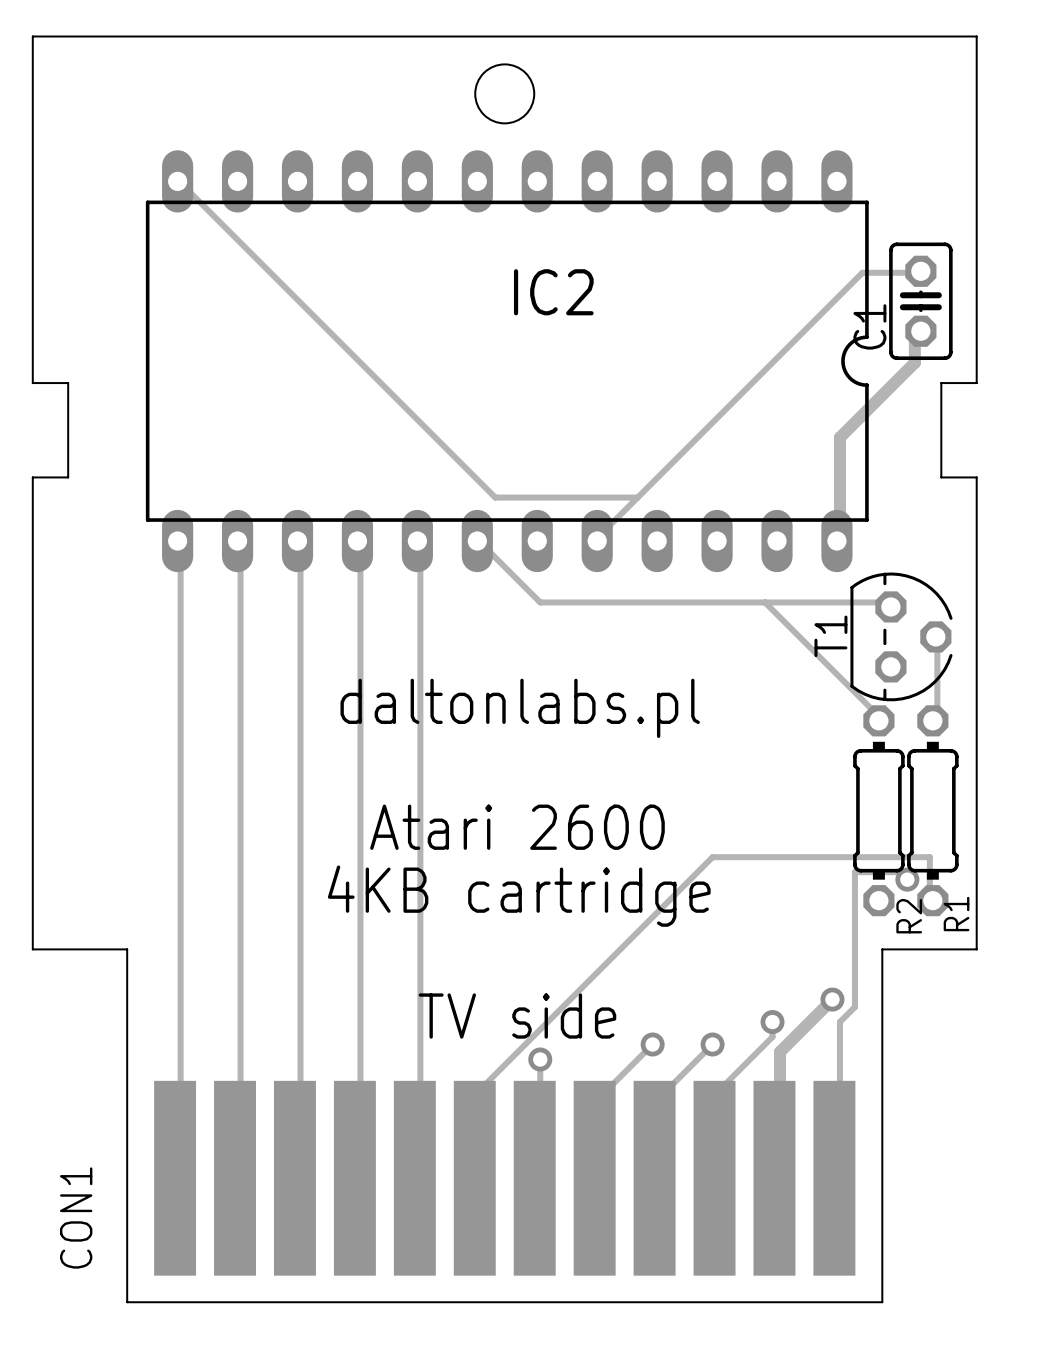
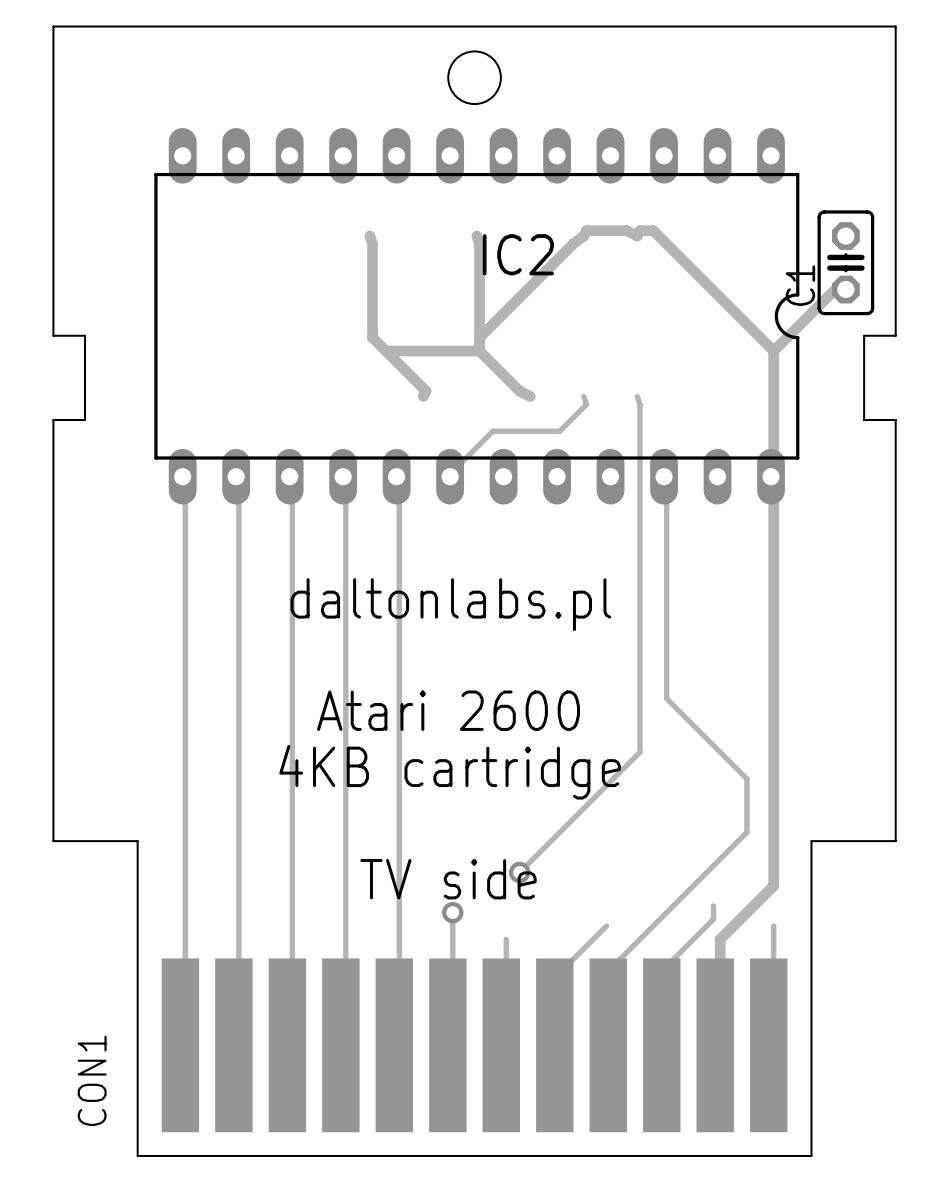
track: (177, 181) (495, 497) (637, 497) -> none
track: none -> (369, 236) (372, 244) (372, 337) (426, 391) (423, 396)
track: none -> (476, 236) (479, 244) (479, 351)
track: (920, 271) (862, 272) (600, 535) (597, 541) -> none
track: (920, 331) (914, 332) (914, 362) (839, 437) -> (845, 289) (840, 284) (773, 351)
track: none -> (479, 337) (573, 244) (583, 236) (586, 230) (626, 230) (637, 236) (639, 230) (653, 230) (773, 351)
track: none -> (385, 351) (479, 351)
track: none -> (479, 351) (519, 391) (530, 396)
track: none -> (773, 351) (773, 384)
track: none -> (637, 396) (639, 404) (639, 752) (519, 872)
track: (477, 541) (540, 602) (884, 602) (890, 606) -> (450, 476) (452, 471) (492, 431) (559, 431) (586, 404) (583, 396)
track: (765, 602) (877, 714) (878, 720) -> none
T1: (901, 636) -> none
track: (935, 636) (937, 714) (932, 720) -> none
text position: daltonlabs.pl (520, 708) -> daltonlabs.pl (450, 604)
R2: (878, 810) -> none
R1: (932, 810) -> none
text position: Atari 2600 (517, 827) -> Atari 2600 (448, 710)
track: (907, 879) (899, 872) (854, 872) (854, 1007) (839, 1022) (839, 1044) -> none
via: (907, 879) -> none
text position: 4KB cartridge (519, 896) -> 4KB cartridge (450, 772)
track: (932, 900) (929, 894) (929, 857) (712, 857) (480, 1089) -> (452, 912) (452, 966)
via: none -> (519, 872)
track: (832, 999) (780, 1051) (780, 1059) -> (771, 476) (773, 484) (773, 885) (720, 939)
via: (832, 999) -> none
text position: TV side (517, 1016) -> TV side (448, 879)
via: (772, 1022) -> none
via: none -> (452, 912)
via: (652, 1044) -> none
track: (712, 1044) (660, 1096) -> (664, 476) (666, 484) (666, 698) (746, 778) (746, 832) (613, 966) (613, 972)
via: (712, 1044) -> none
via: (540, 1059) -> none

